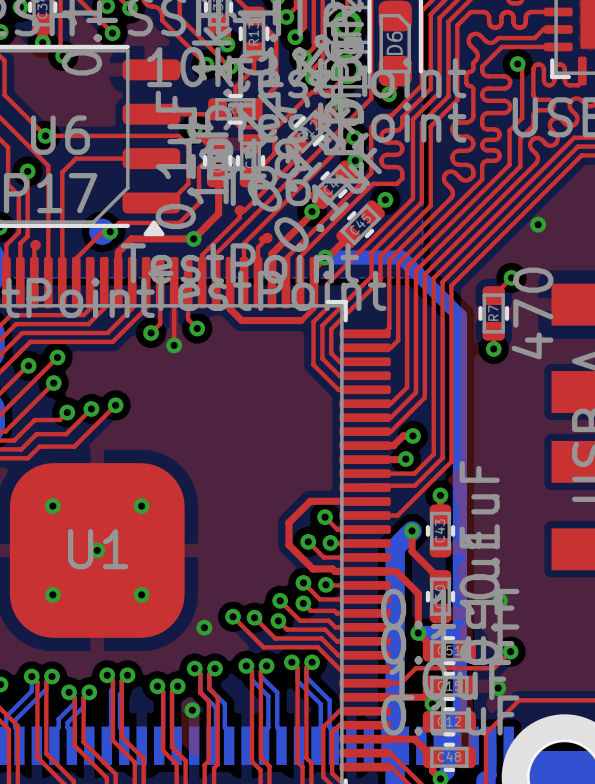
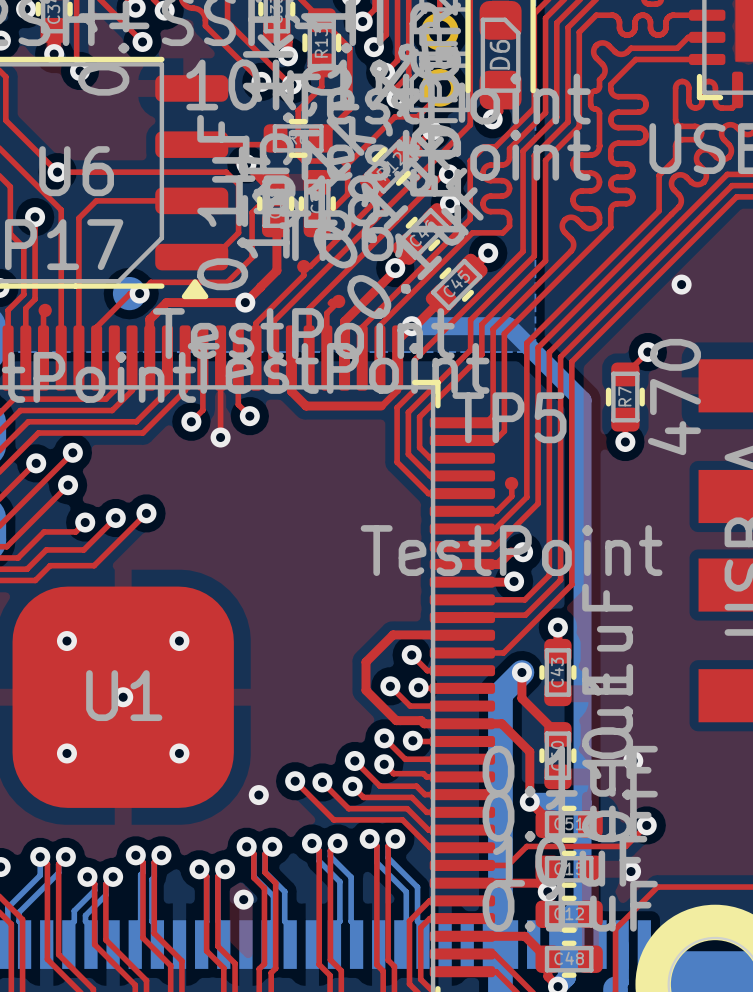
top track: (517, 64) (522, 68) (522, 118) (509, 130) (509, 164) (407, 267) (407, 387) (390, 403) -> (511, 483) (511, 496) (495, 511)
via: (517, 64) -> none
TP5: none -> TestPoint (511, 483)

